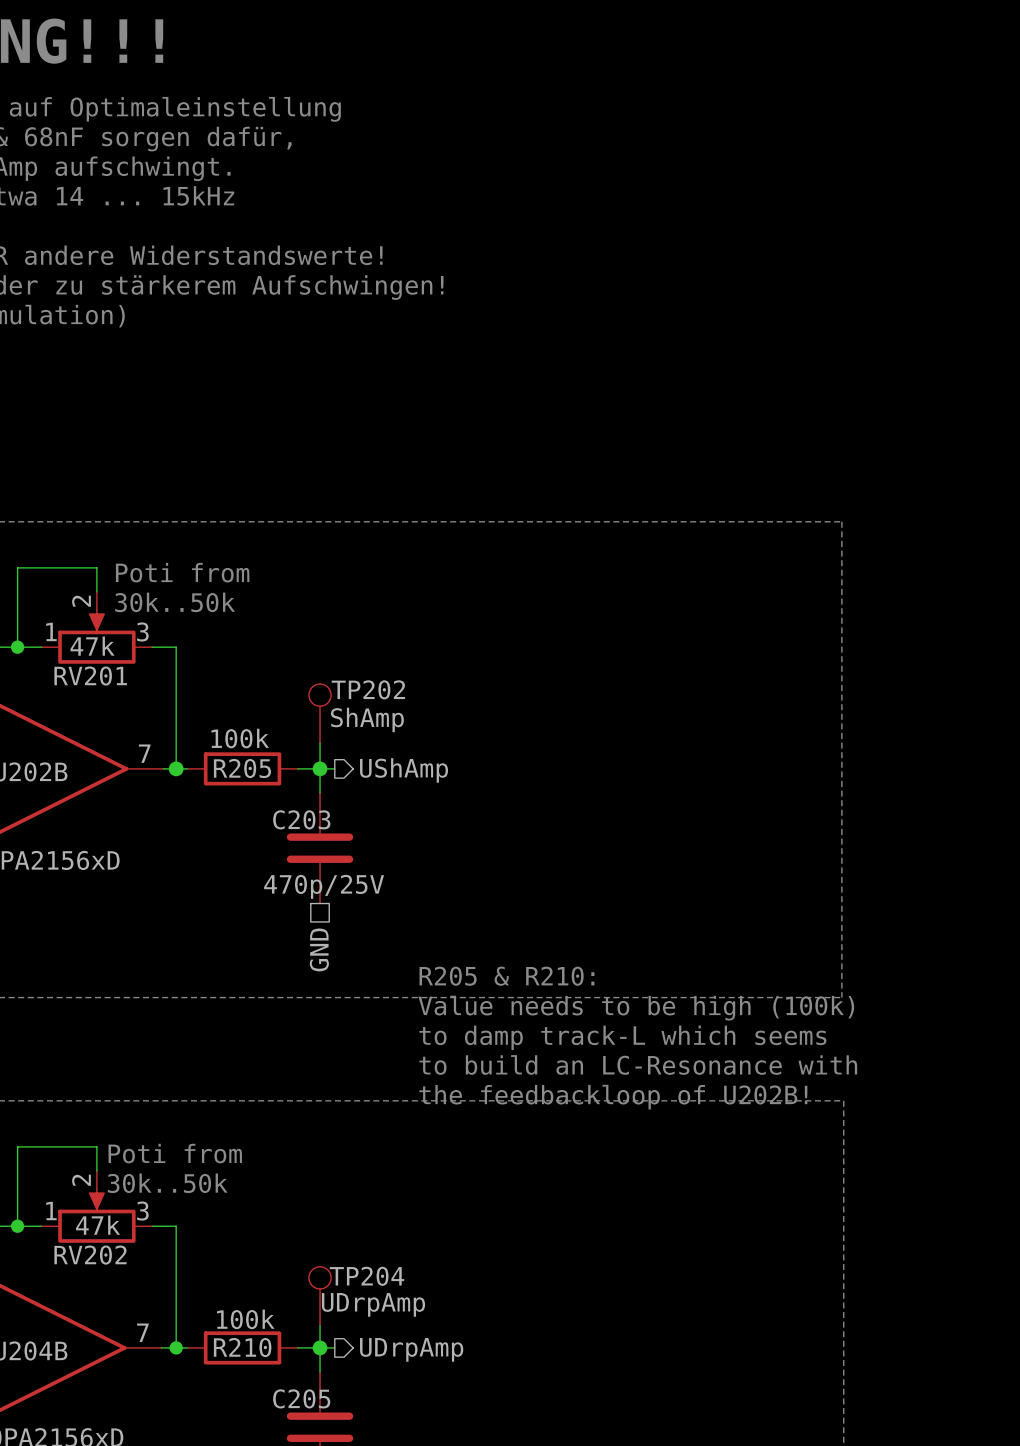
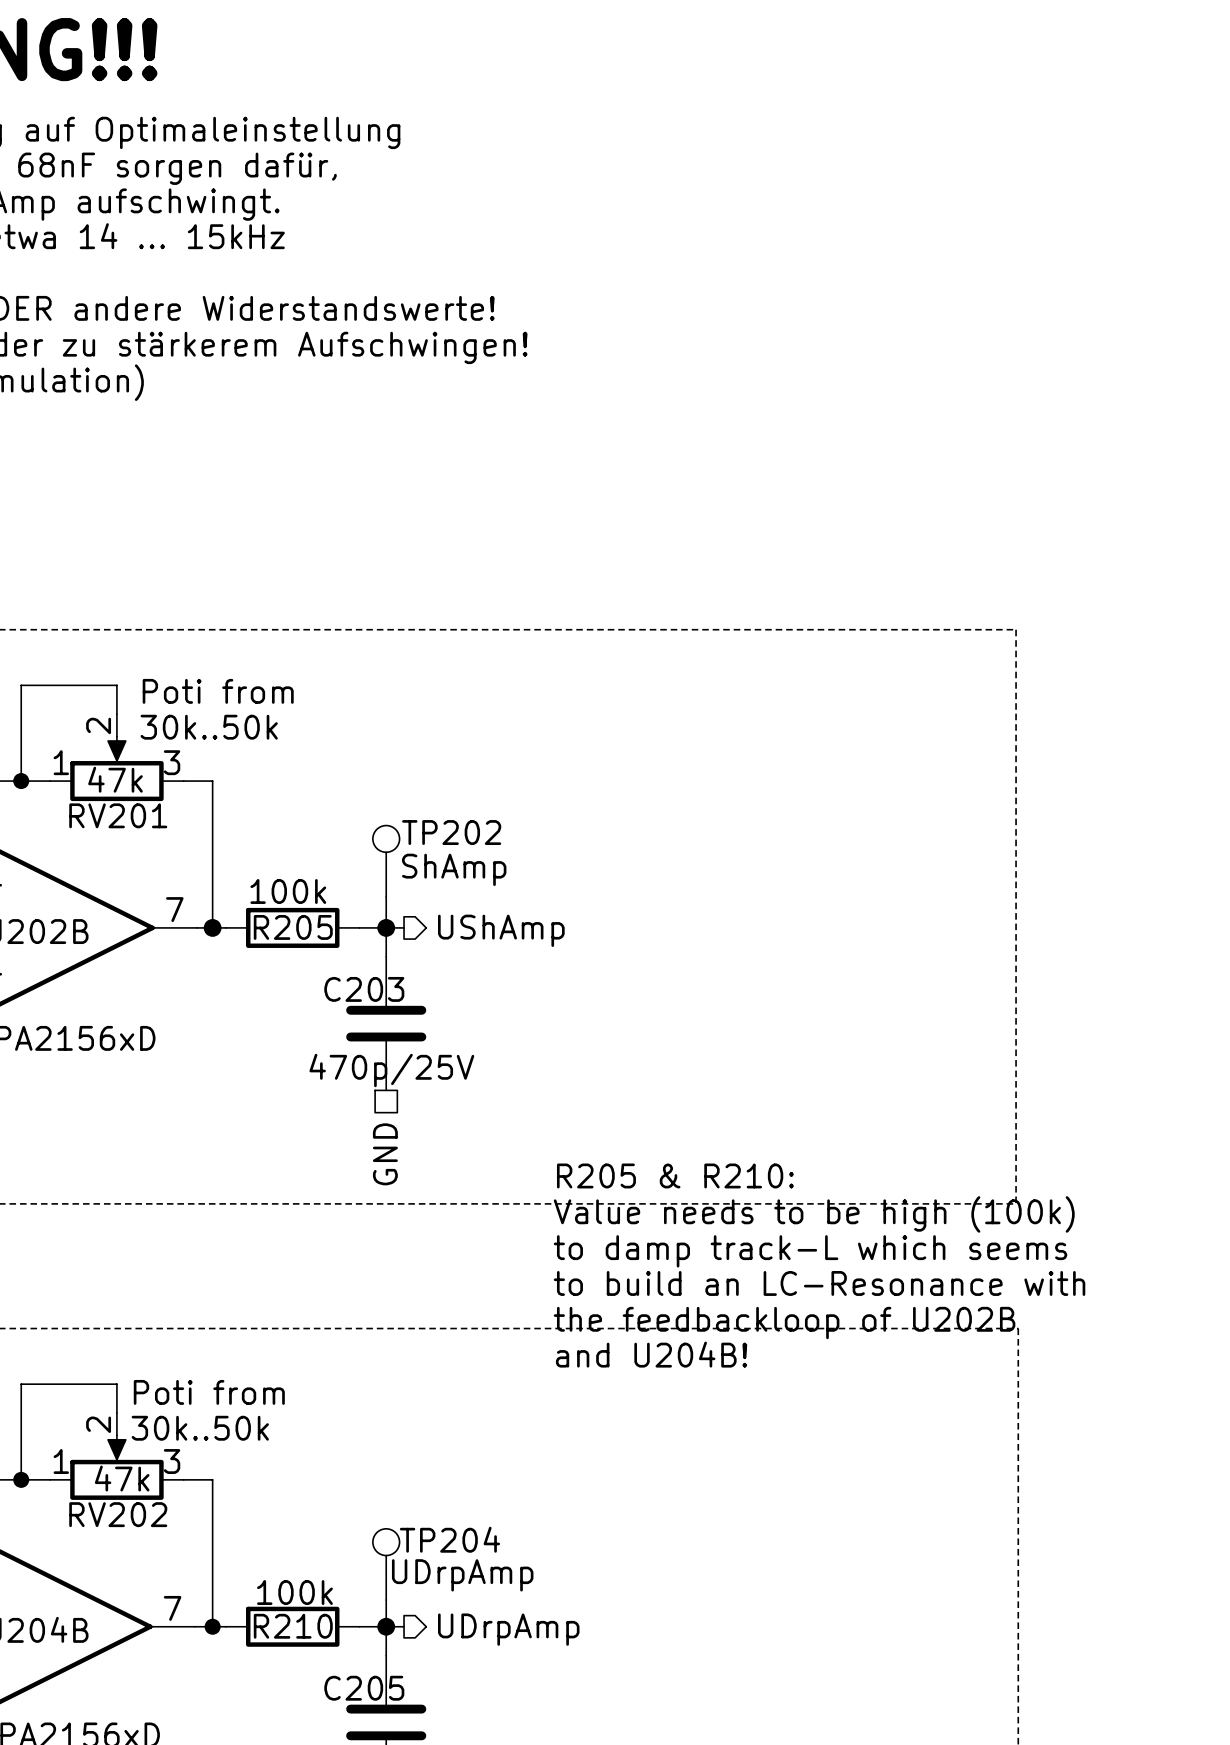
text position: R205 & R210: (506, 976) -> R205 & R210: (675, 1175)
text position: Value needs to be high (100k) (636, 1008) -> Value needs to be high (100k) (814, 1214)
text position: to damp track-L which seems (622, 1037) -> to damp track-L which seems (810, 1251)
text position: to build an LC-Resonance with (638, 1064) -> to build an LC-Resonance with (819, 1283)
text: the feedbackloop of U202B! (613, 1097) -> the feedbackloop of U202B (784, 1323)
text: none -> and U204B! (651, 1354)

